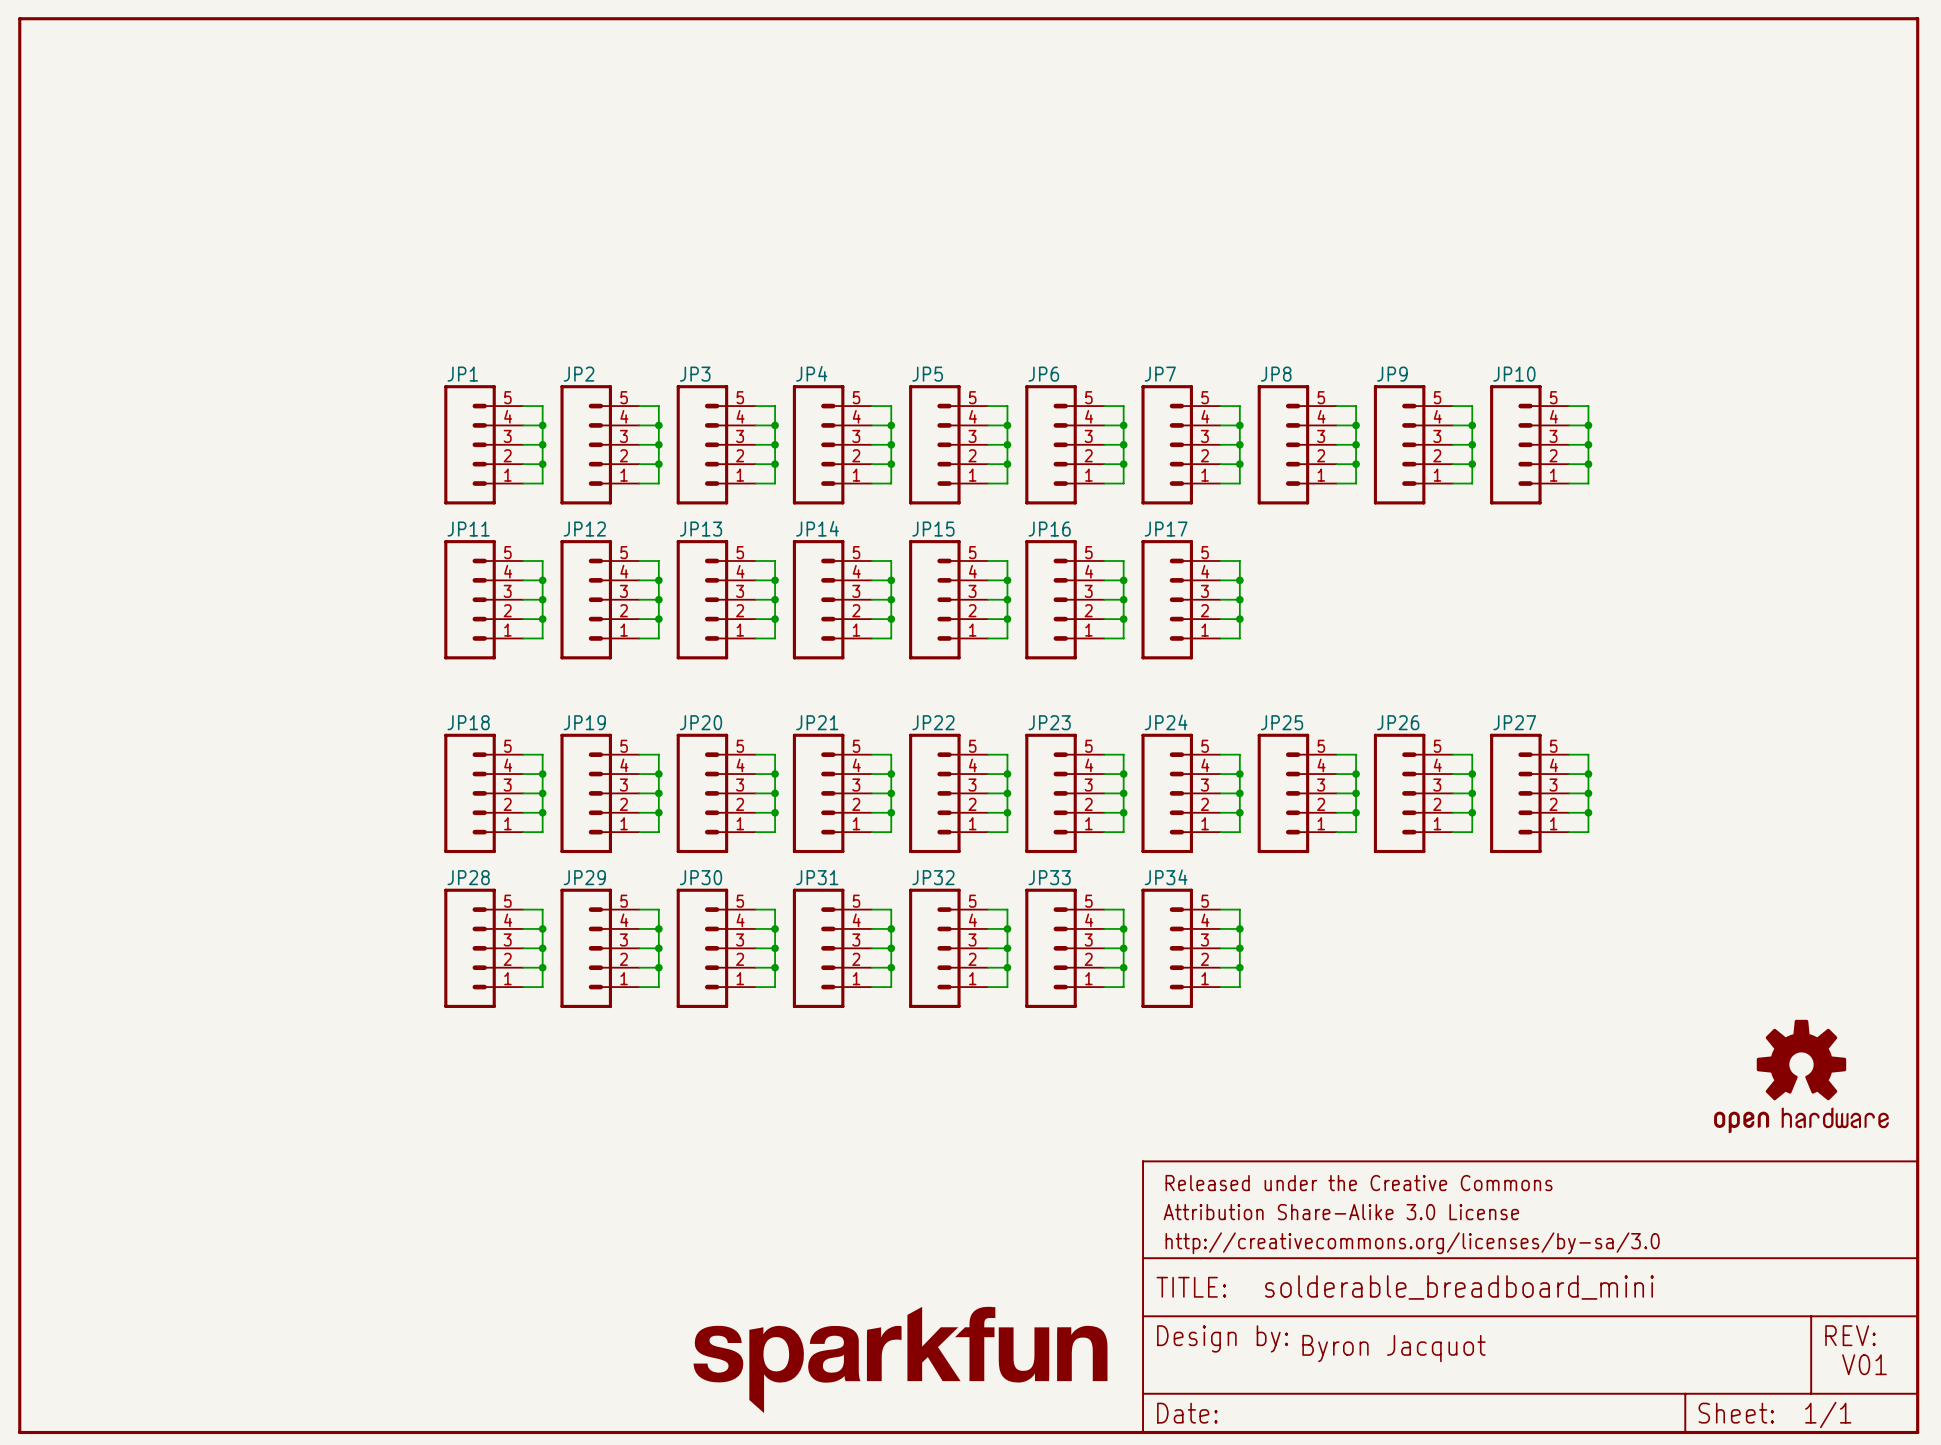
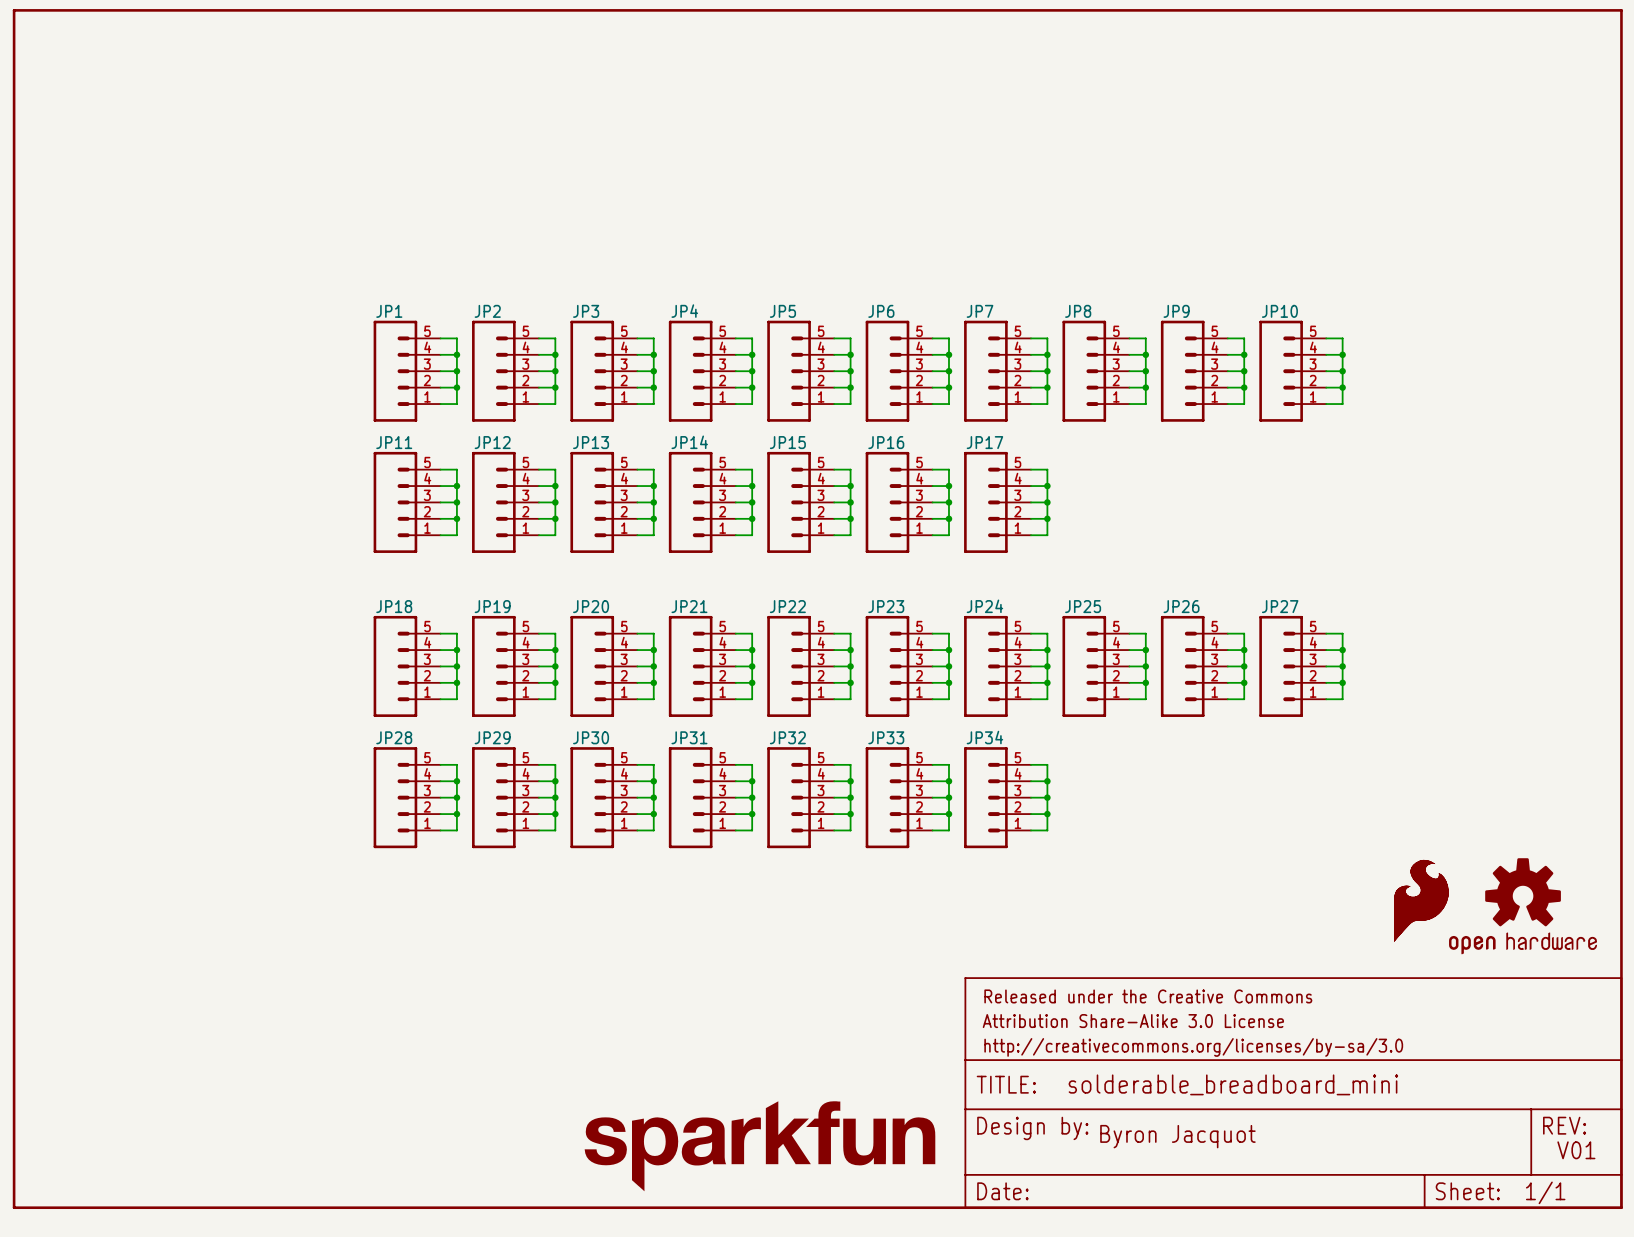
part: none -> (1421, 900)

